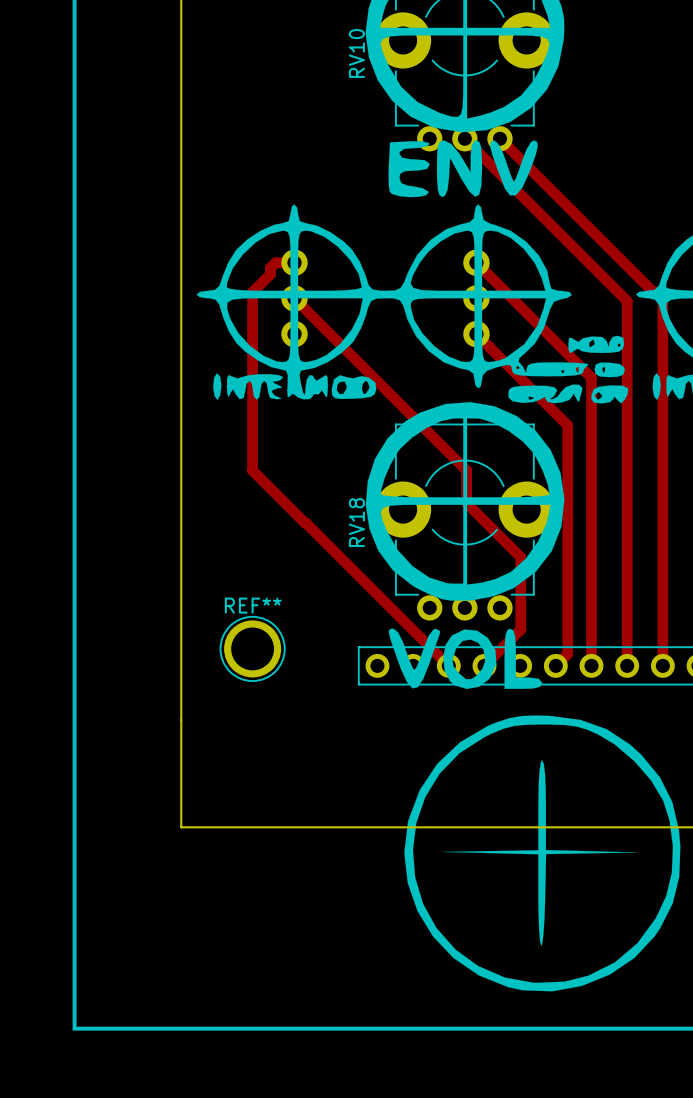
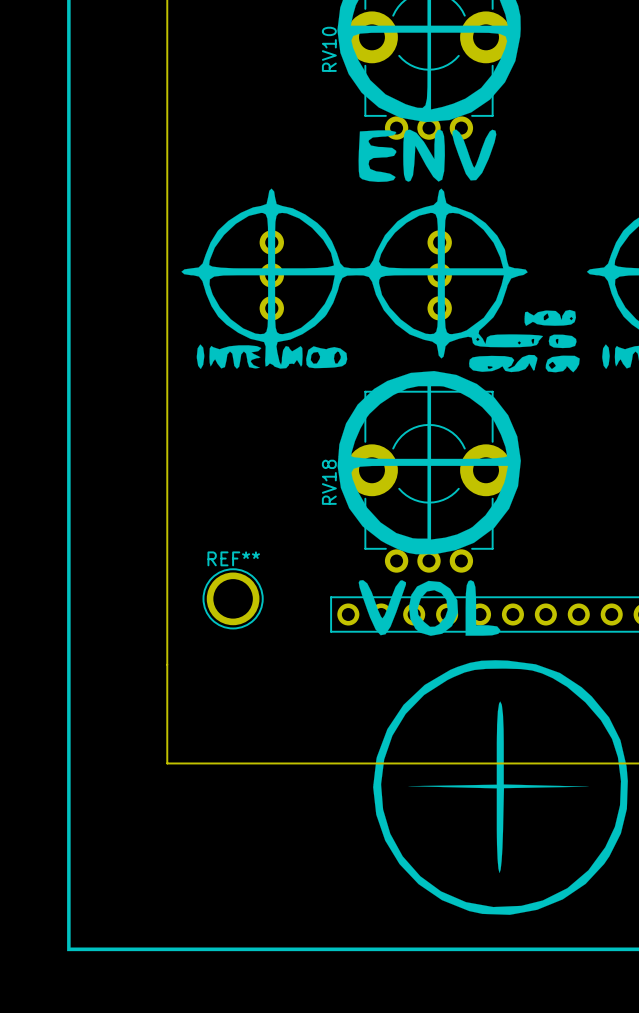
track: (464, 138) (627, 301) (627, 665) -> none
track: (499, 138) (653, 292) (662, 292) (662, 665) -> none
track: (294, 262) (275, 262) (270, 268) (270, 274) (252, 292) (252, 470) (448, 665) -> none
track: (476, 262) (591, 377) (591, 665) -> none
track: (294, 298) (466, 470) (466, 503) (520, 557) (520, 629) (484, 665) -> none
track: (476, 334) (567, 425) (567, 653) (555, 665) -> none

